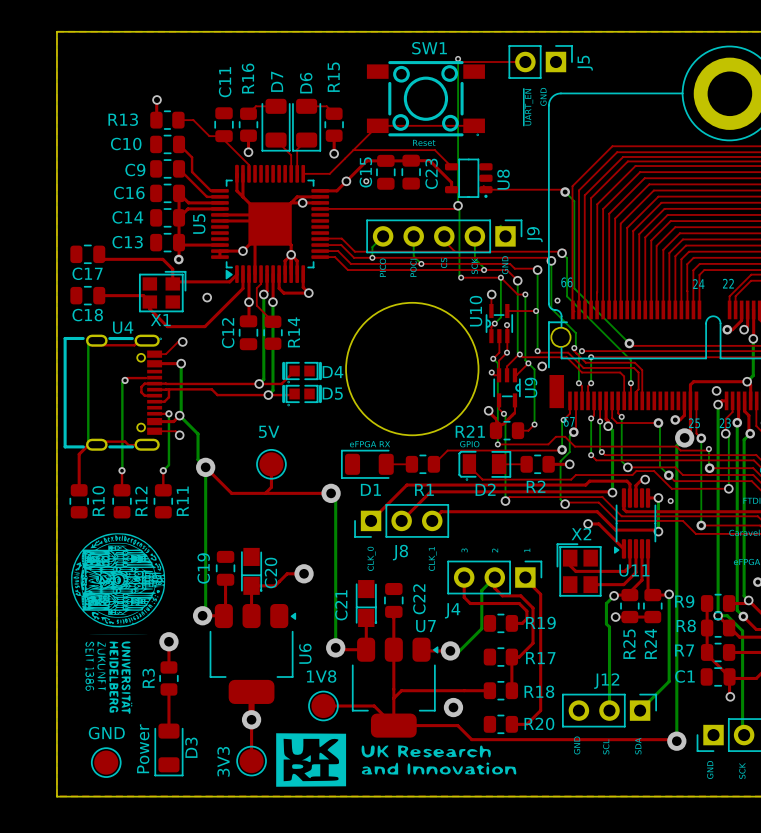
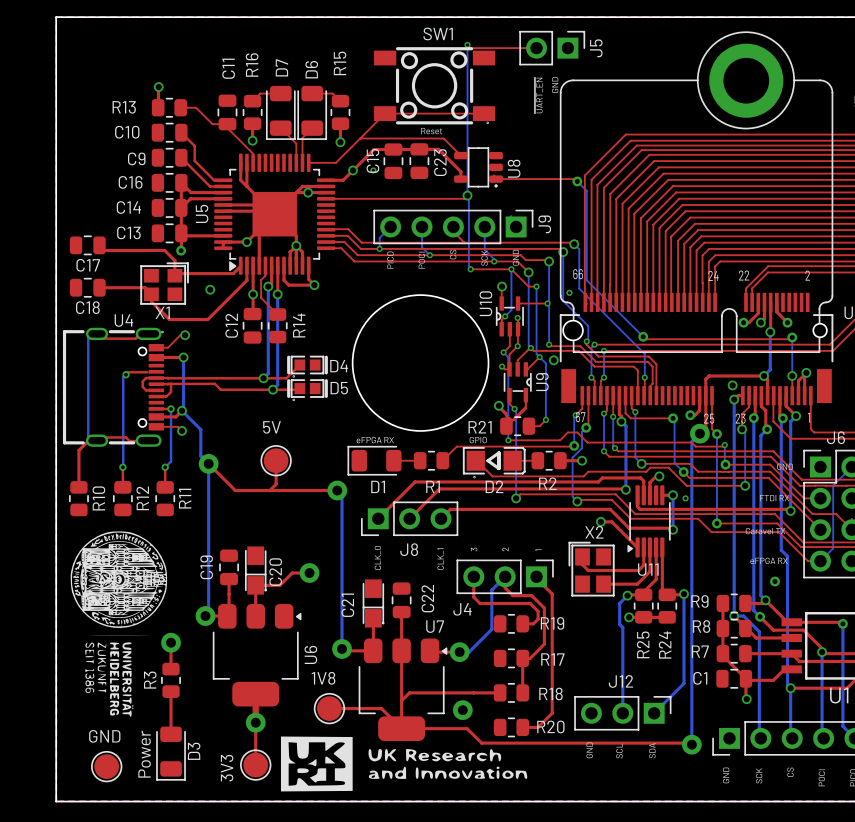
D2 footprint: [458, 450, 512, 481] -> [462, 446, 526, 478]

